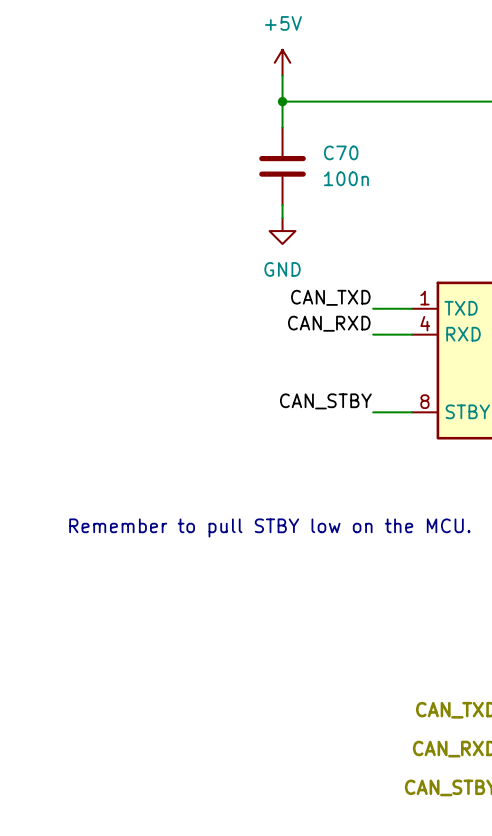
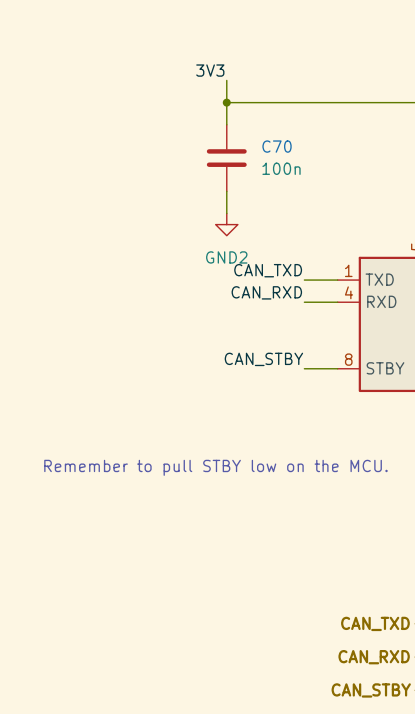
power symbol: +5V (282, 62) -> none
label: none -> 3V3 (210, 70)
power symbol: GND (282, 231) -> none
power symbol: none -> GND2 (226, 224)

